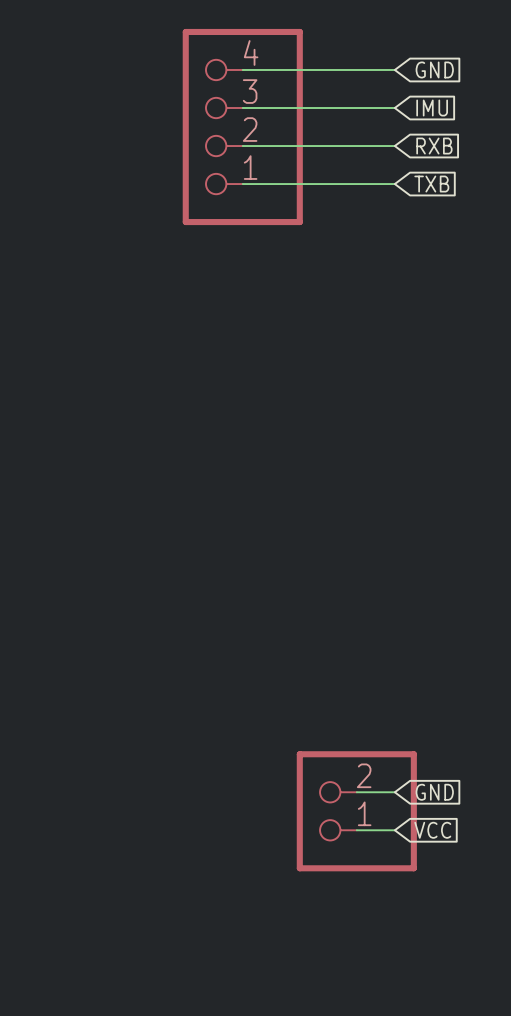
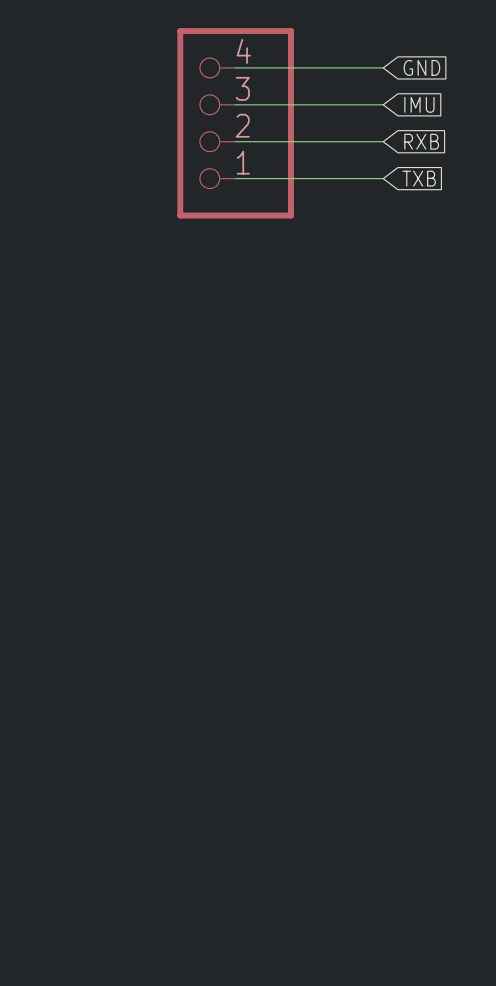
wire: (356, 792) (394, 792) -> none
global label: GND (434, 792) -> none
part: (356, 811) -> none
wire: (356, 830) (394, 830) -> none
global label: VCC (432, 830) -> none

